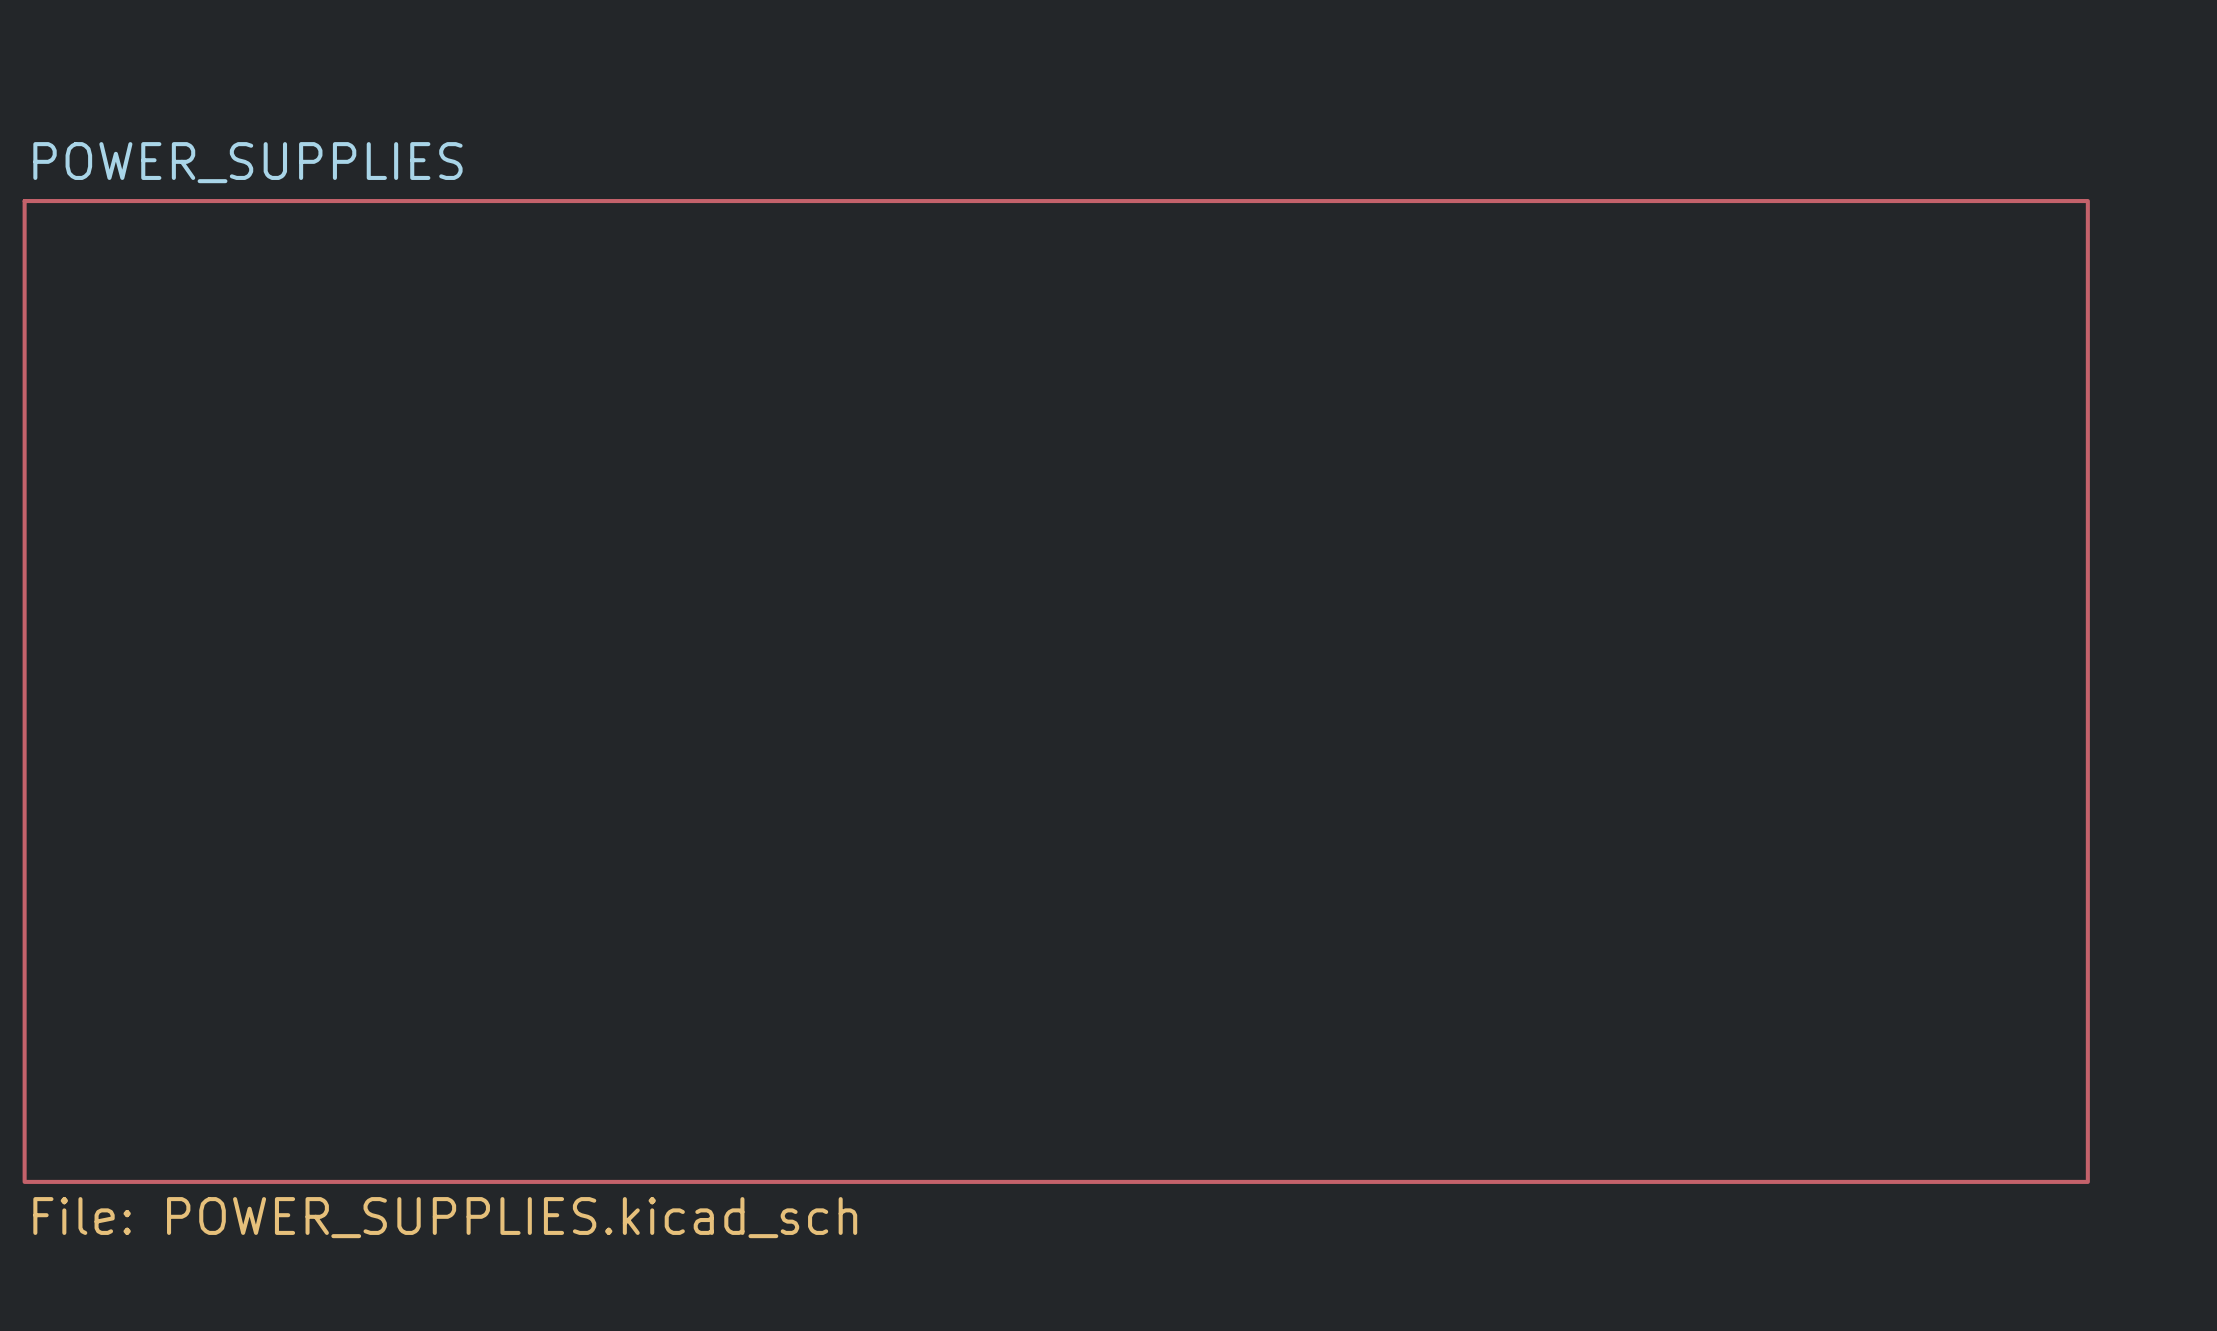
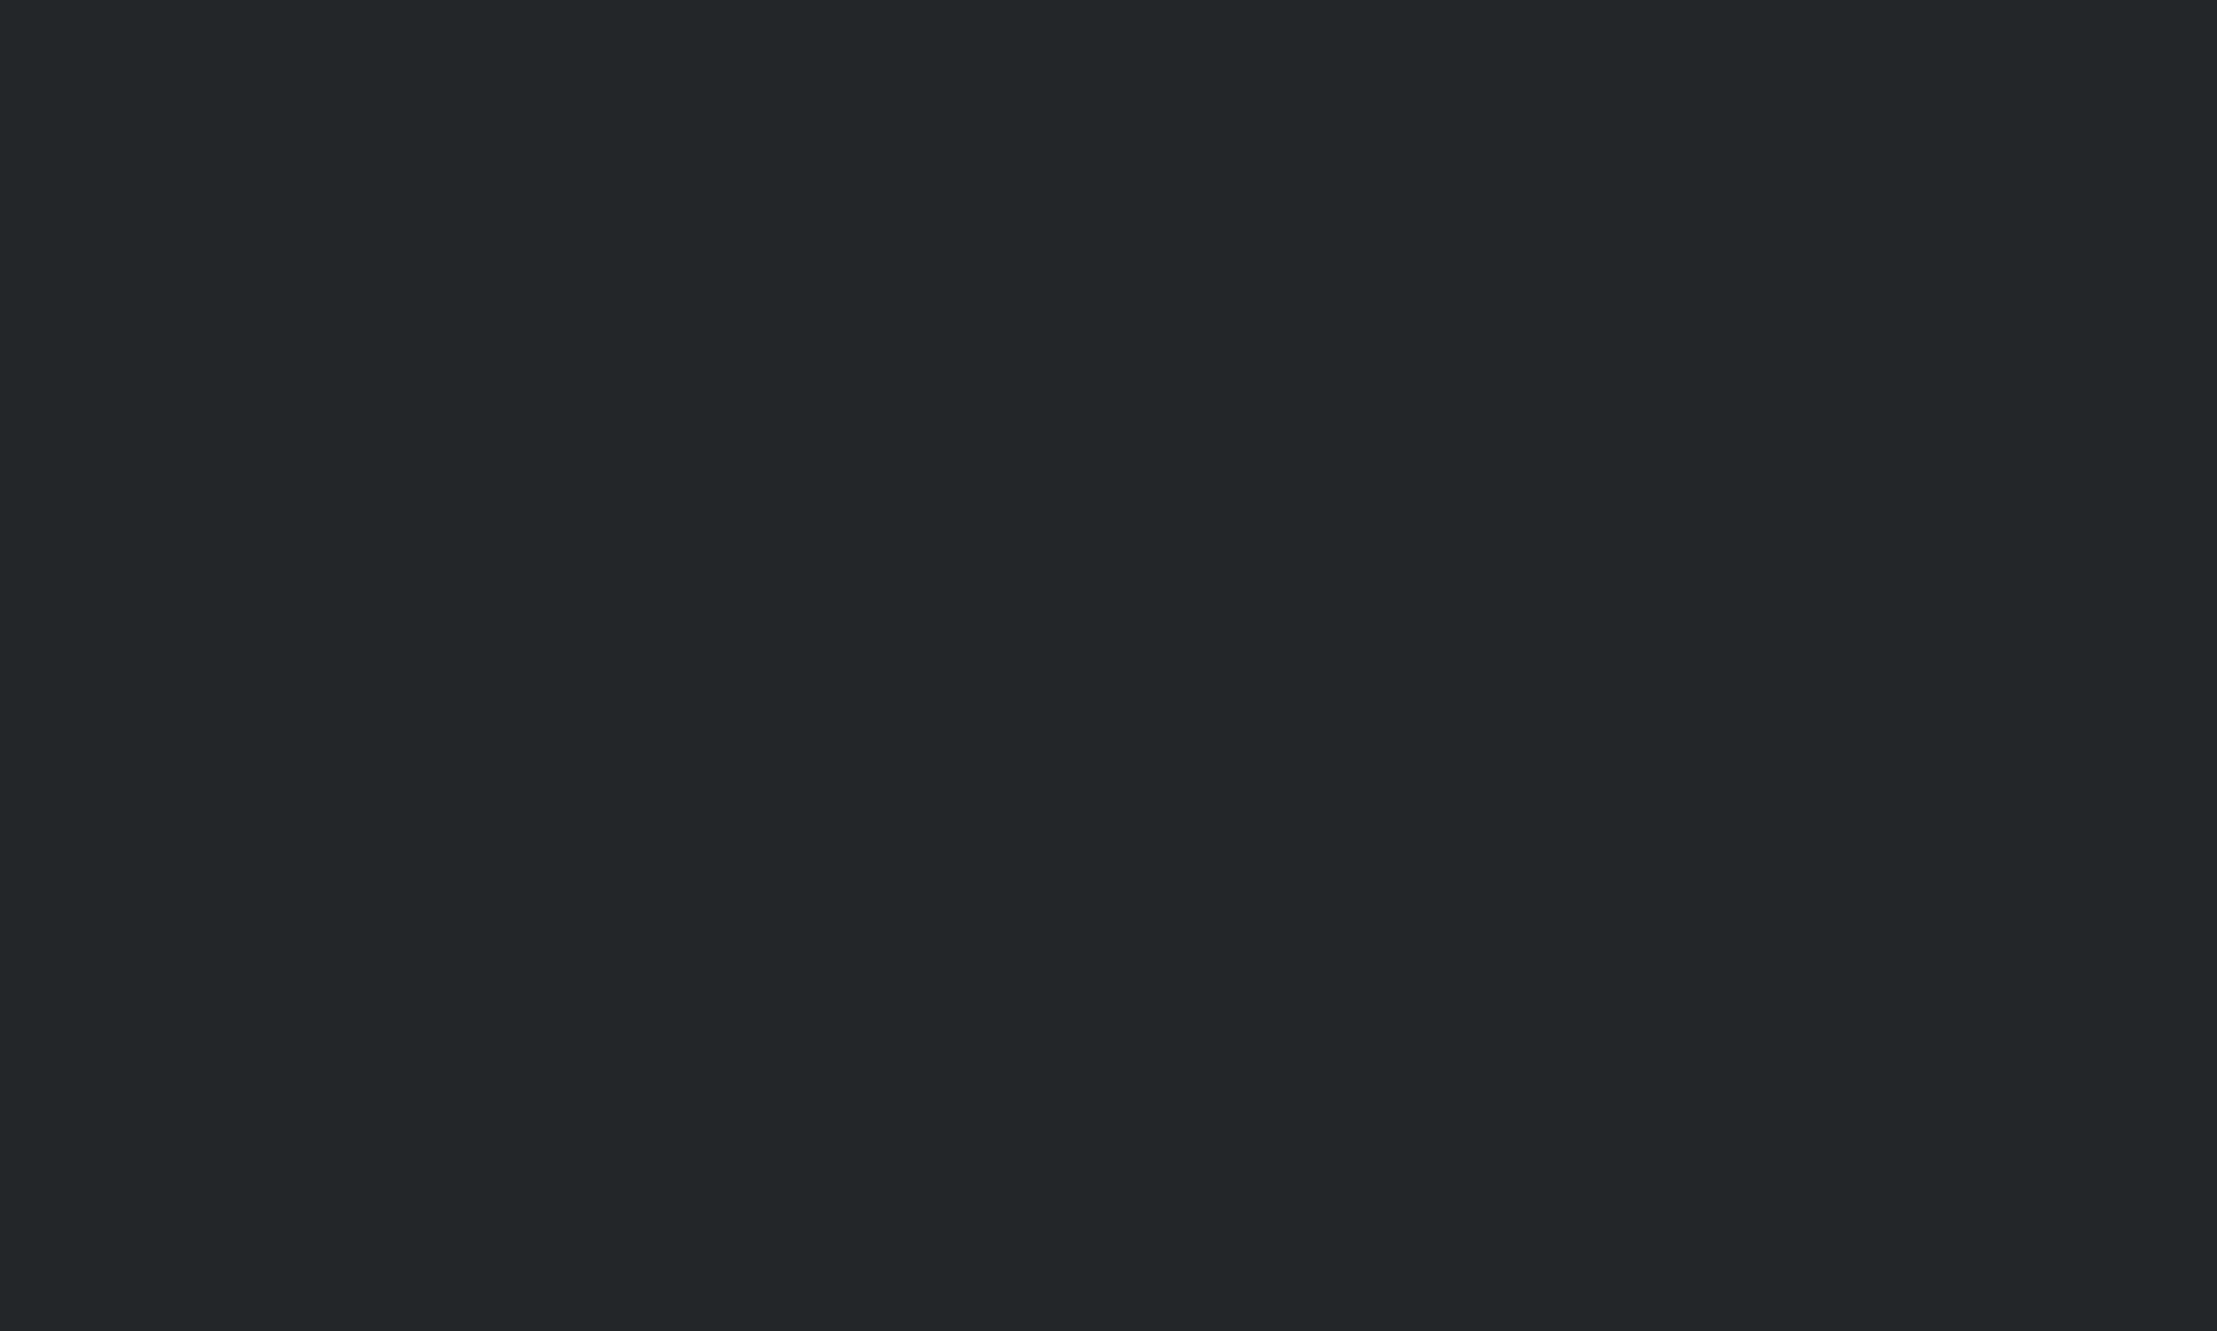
sheet POWER_SUPPLIES: File: POWER_SUPPLIES.kicad_sch (1056, 691) -> none

